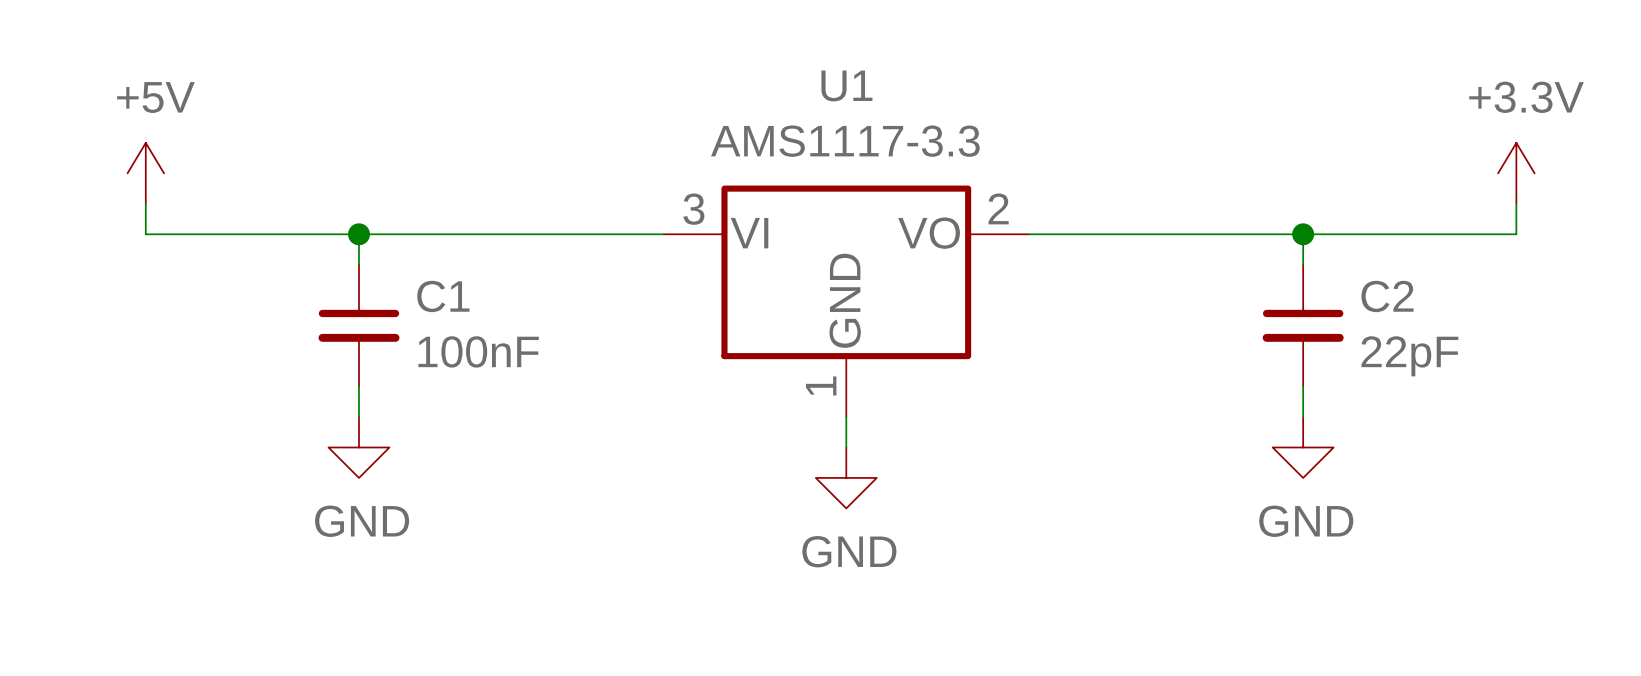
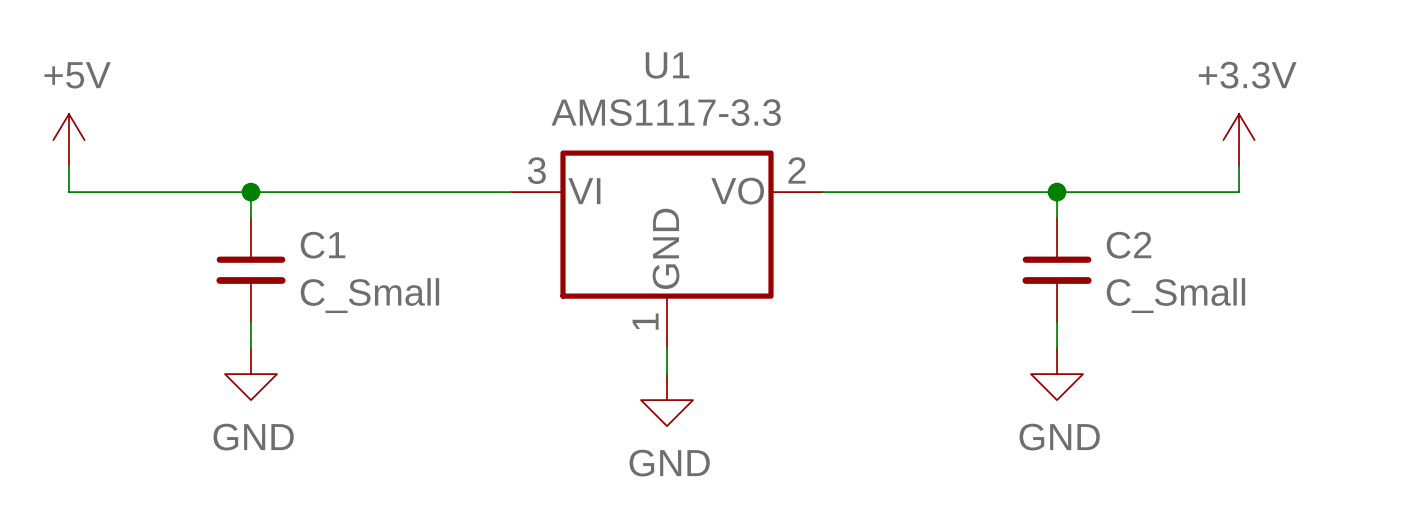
C1 value: 100nF (478, 351) -> C_Small (369, 295)
C2 value: 22pF (1409, 356) -> C_Small (1175, 295)

